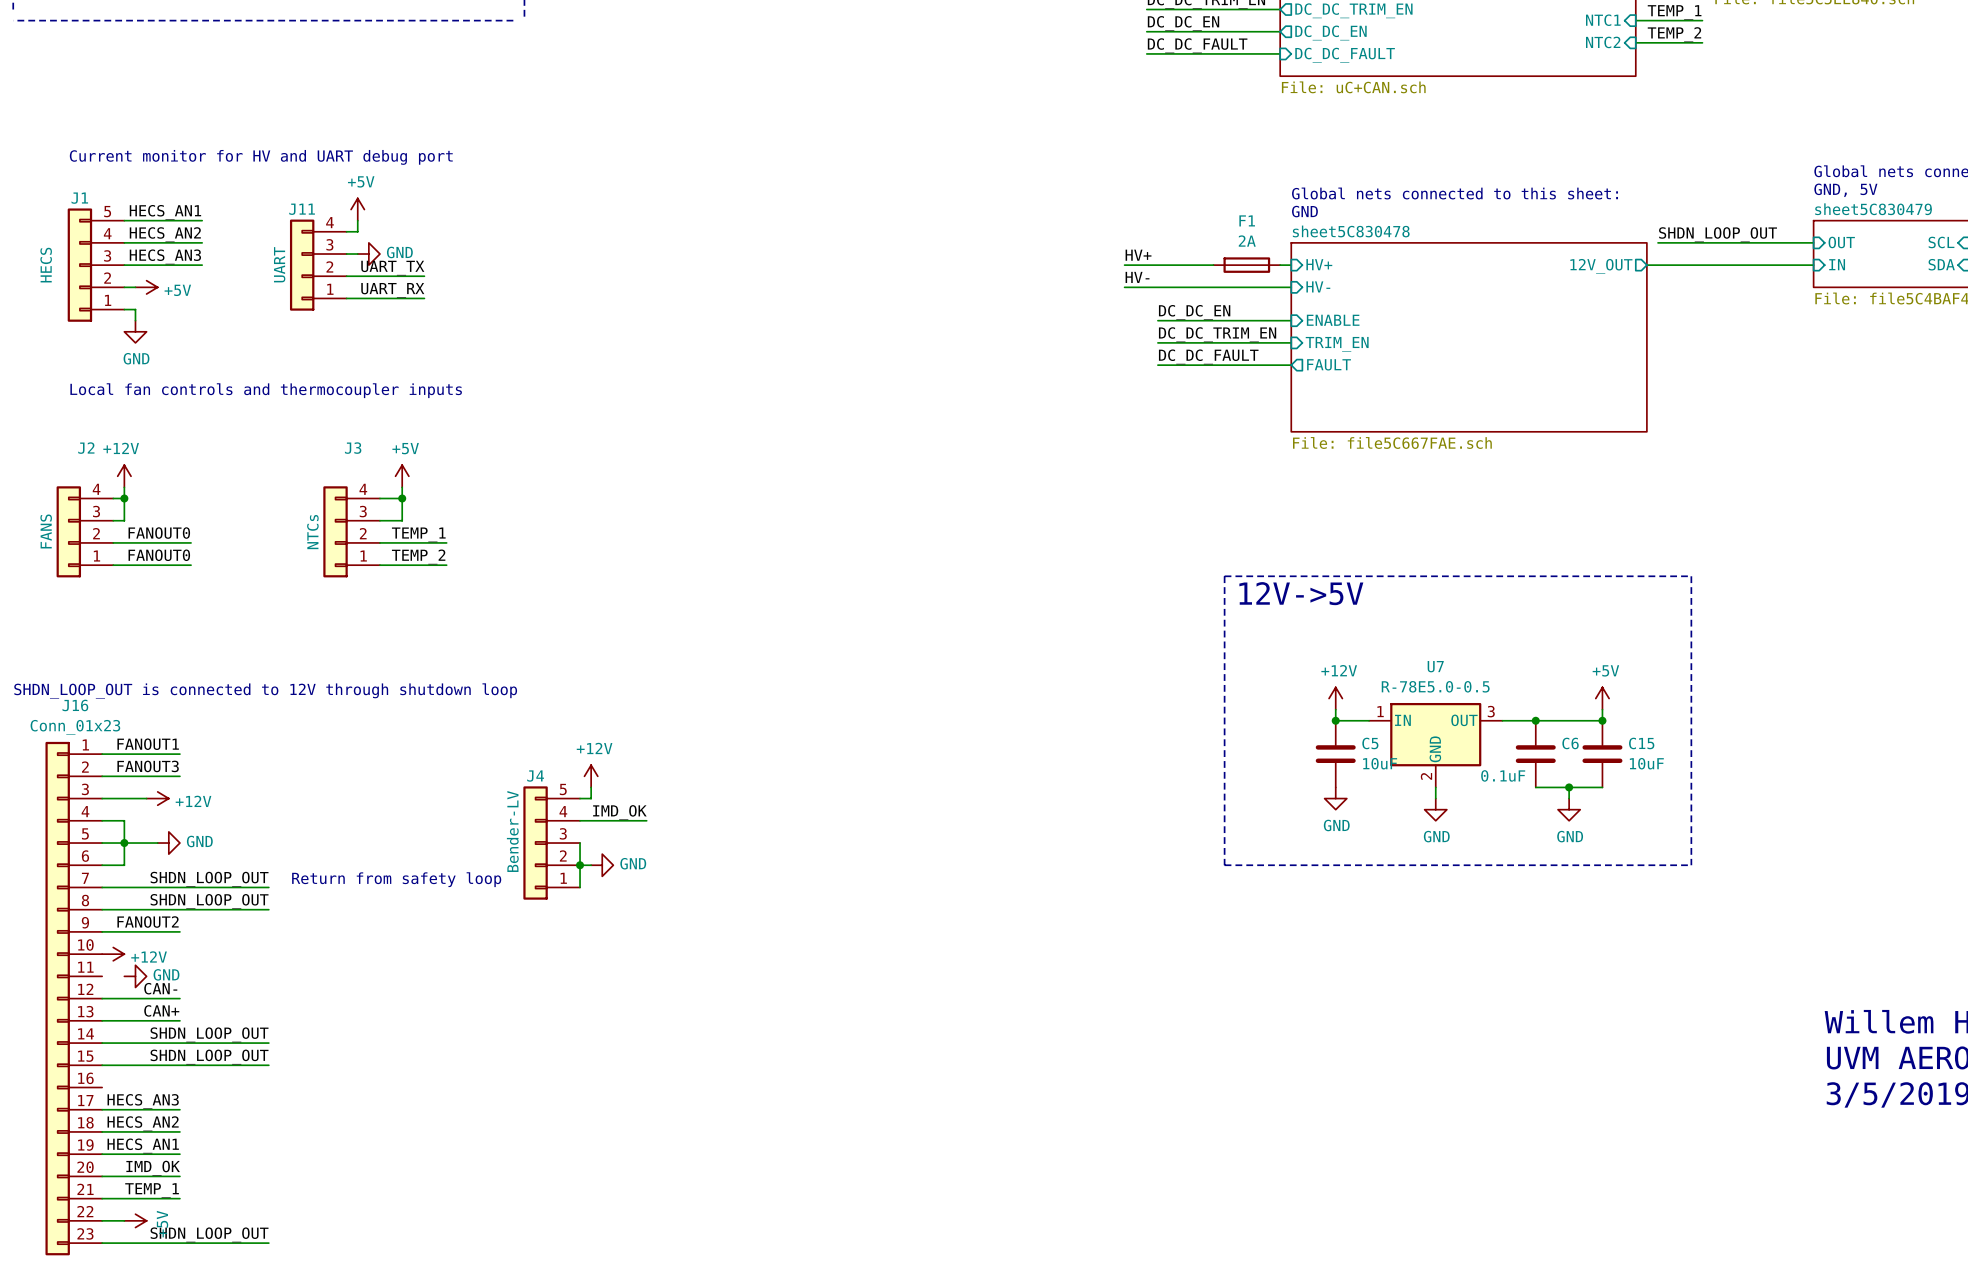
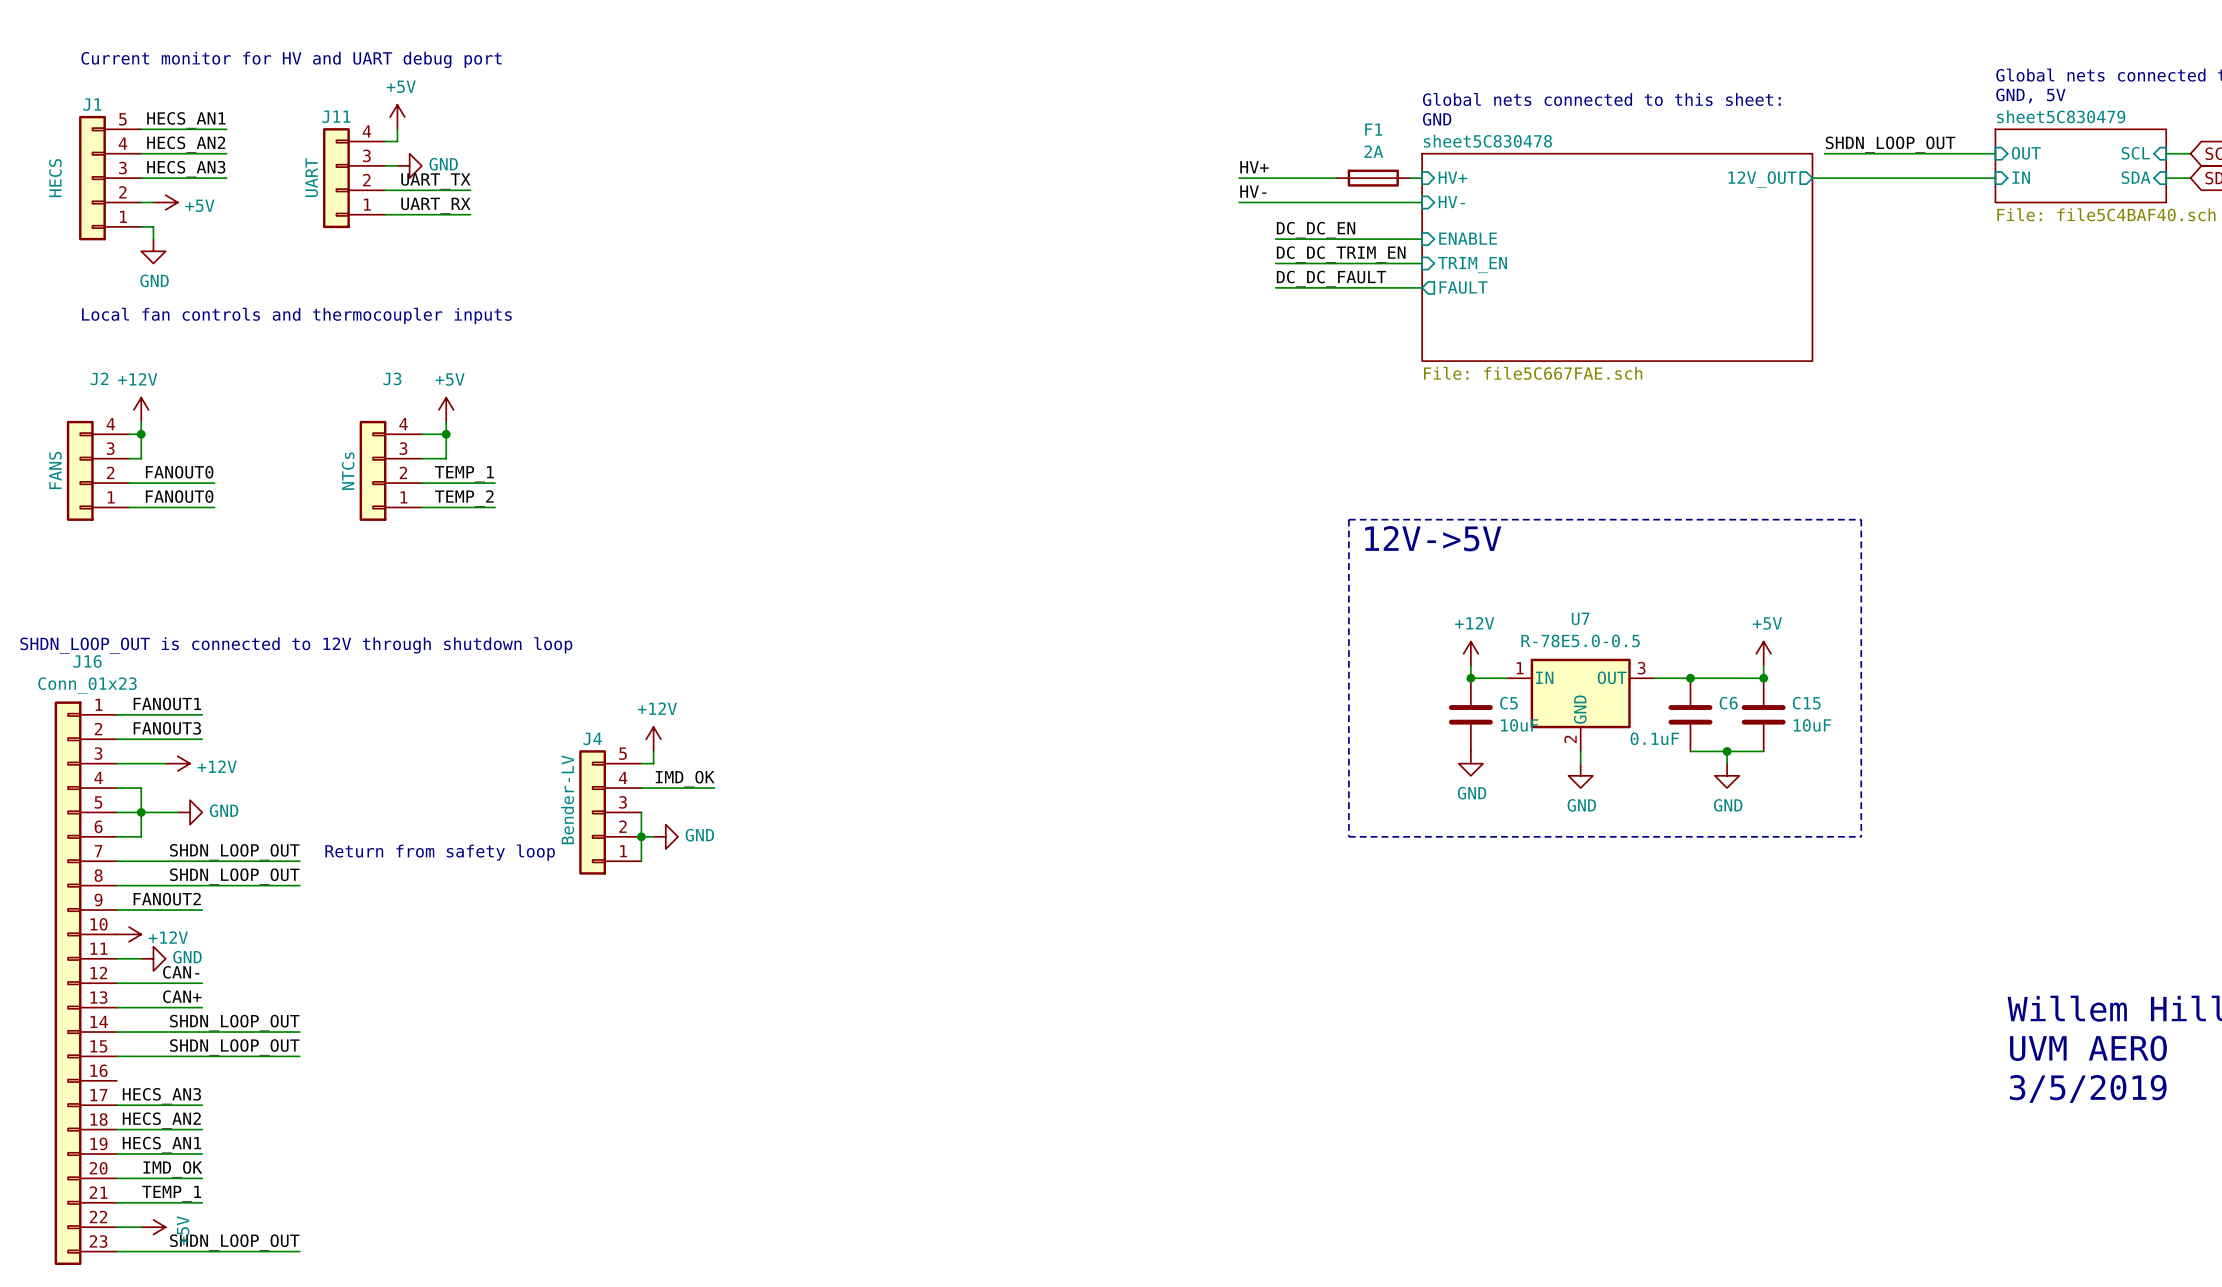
wire: none -> (116, 958) (141, 958)

